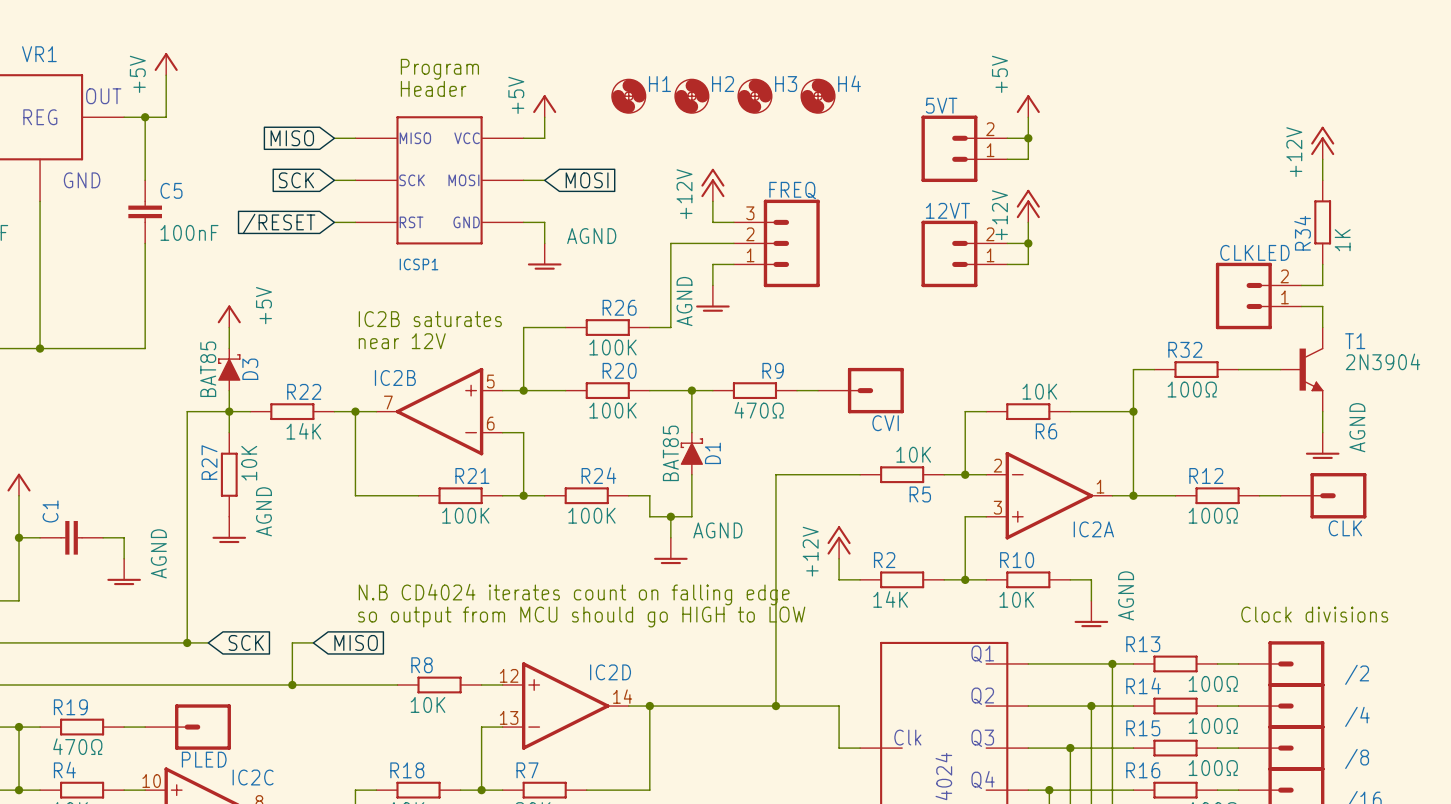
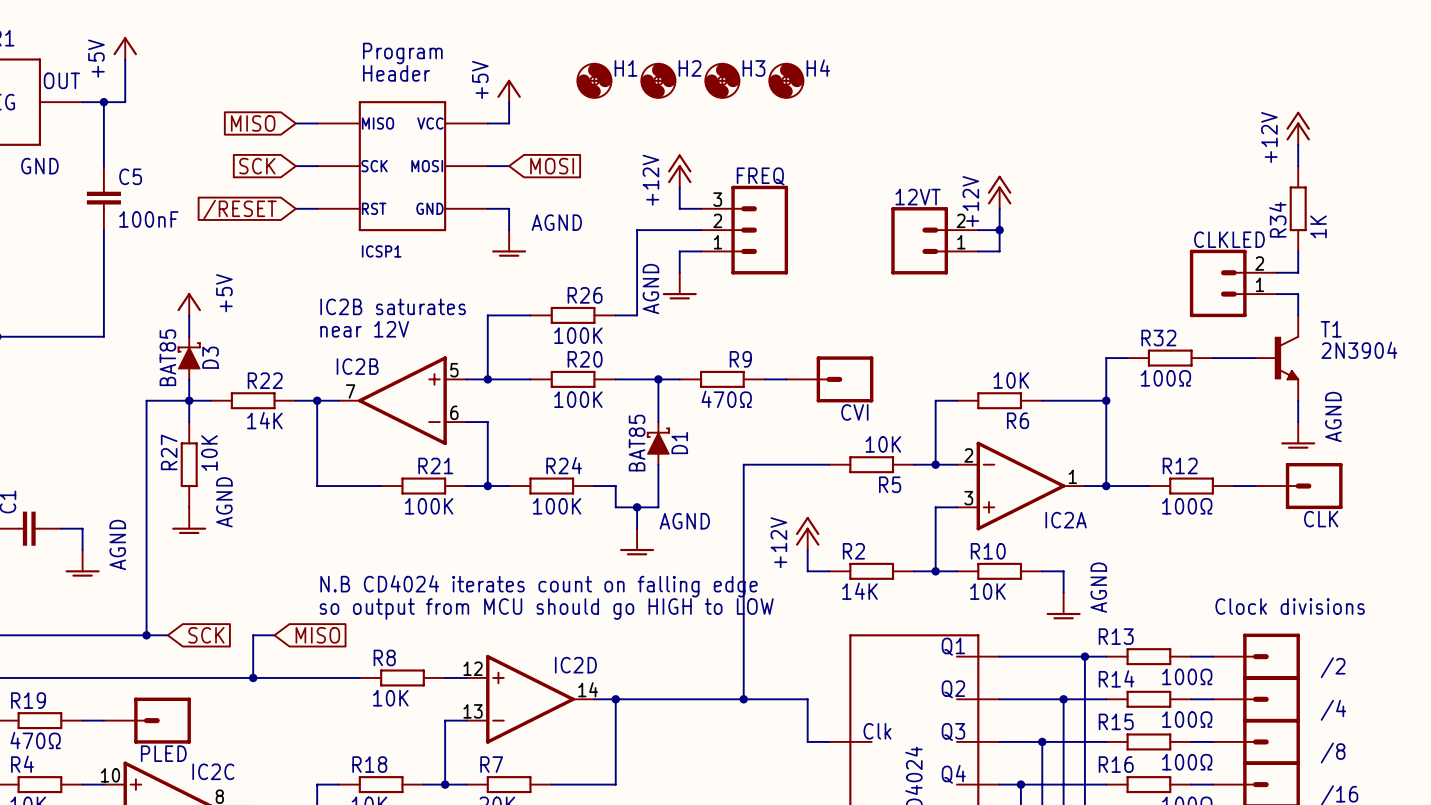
power symbol: +5V (1028, 106) -> none
wire: (1028, 117) (1028, 159) (1007, 159) -> none
wire: (1007, 138) (1028, 138) -> none
junction: (1028, 138) -> none
5VT: (964, 148) -> none

